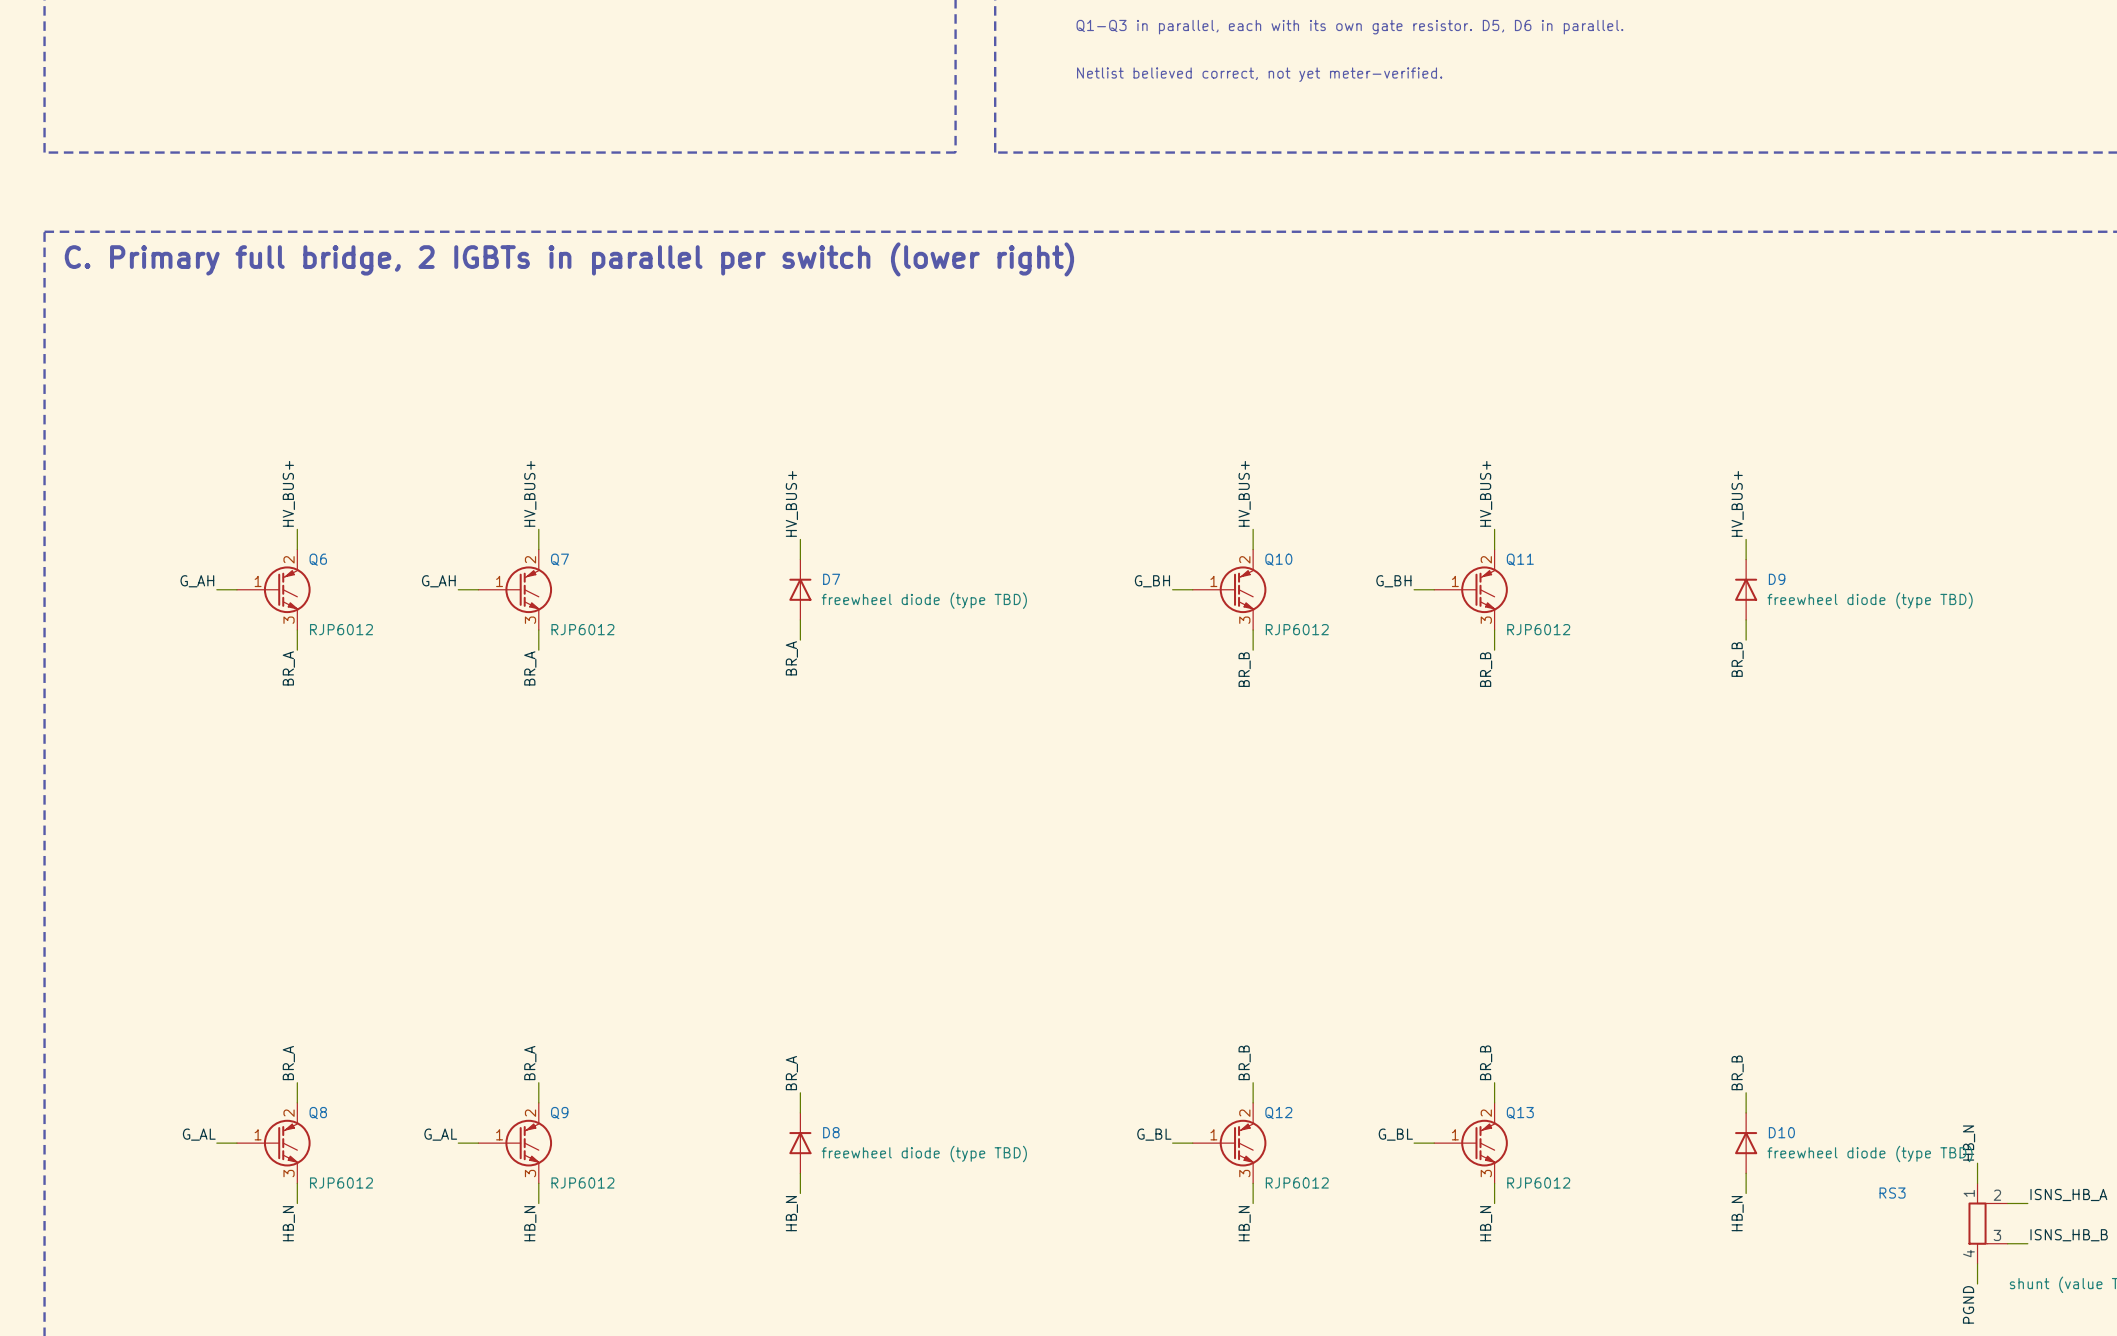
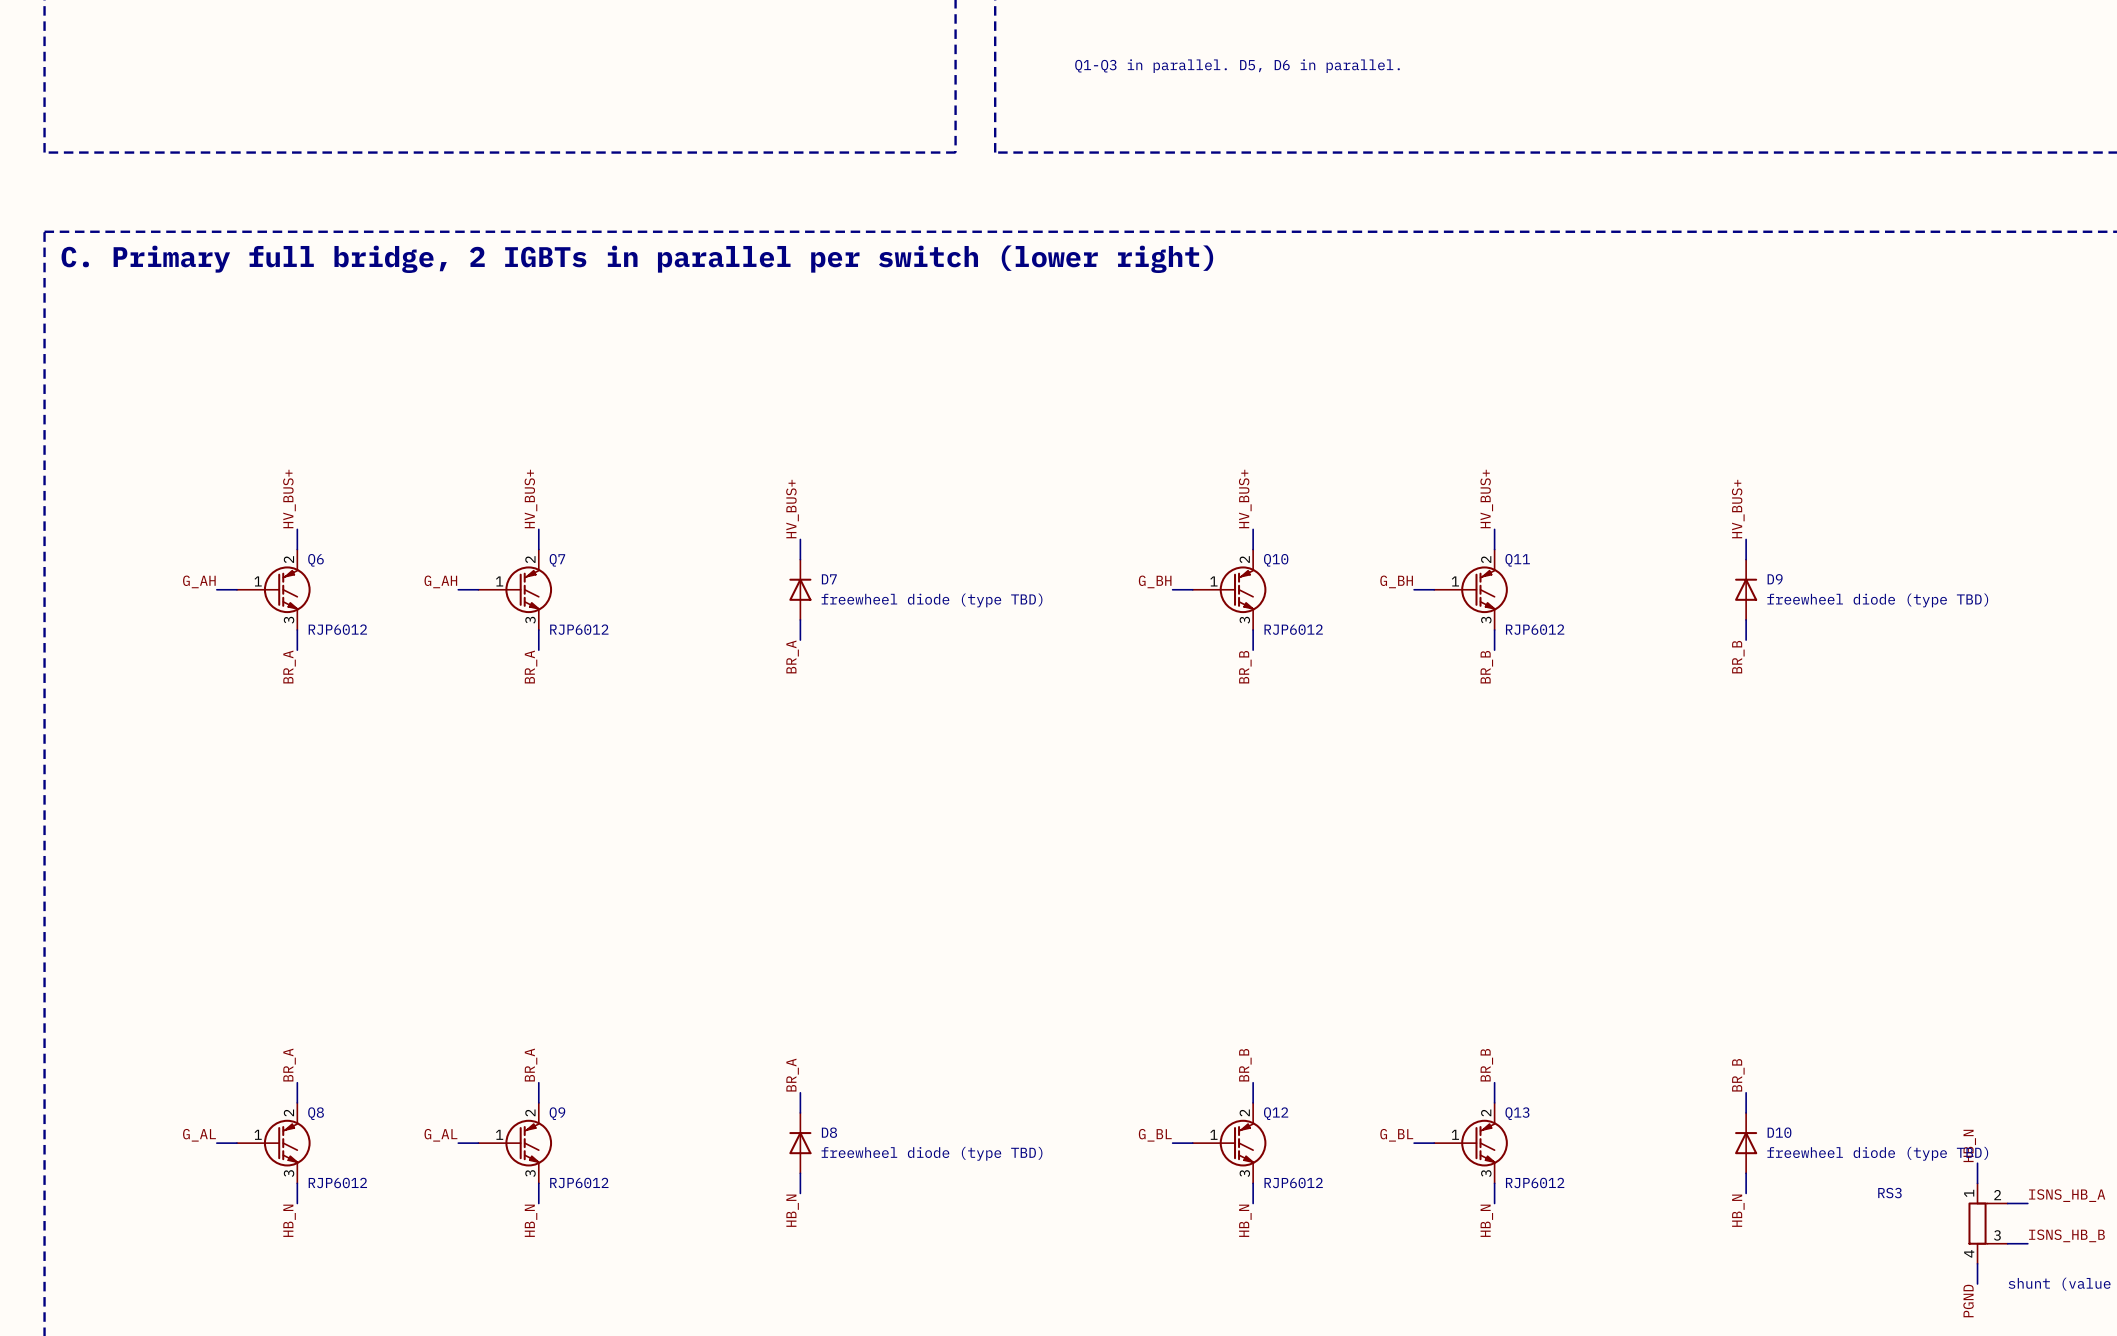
text: Q1-Q3 in parallel, each with its own gate resistor. D5, D6 in parallel. (1349, 27) -> none
text: Netlist believed correct, not yet meter-verified. (1259, 74) -> Q1-Q3 in parallel. D5, D6 in parallel. (1237, 66)

